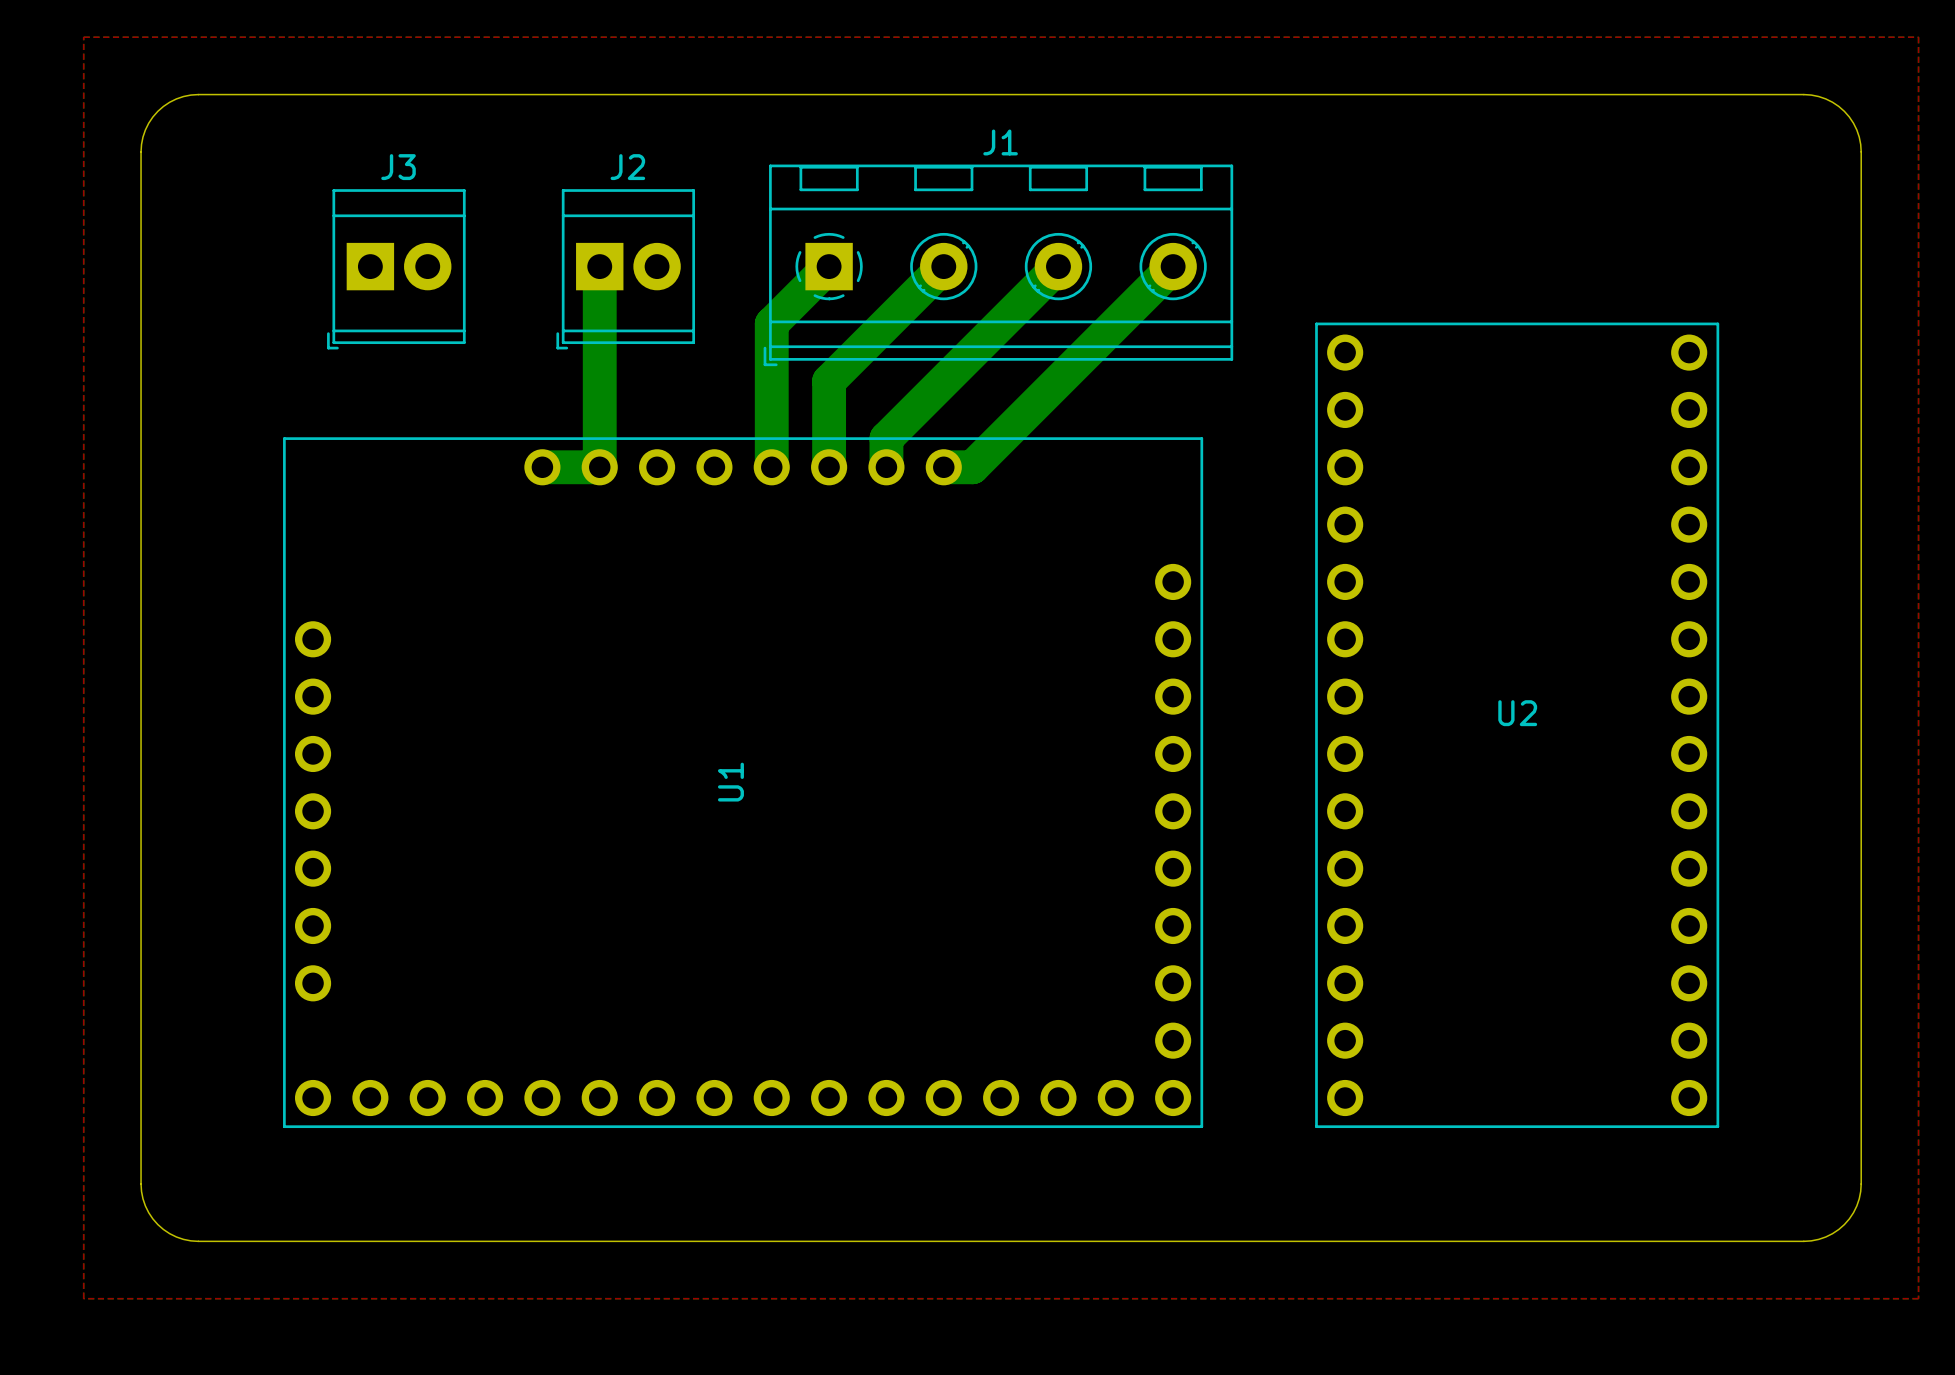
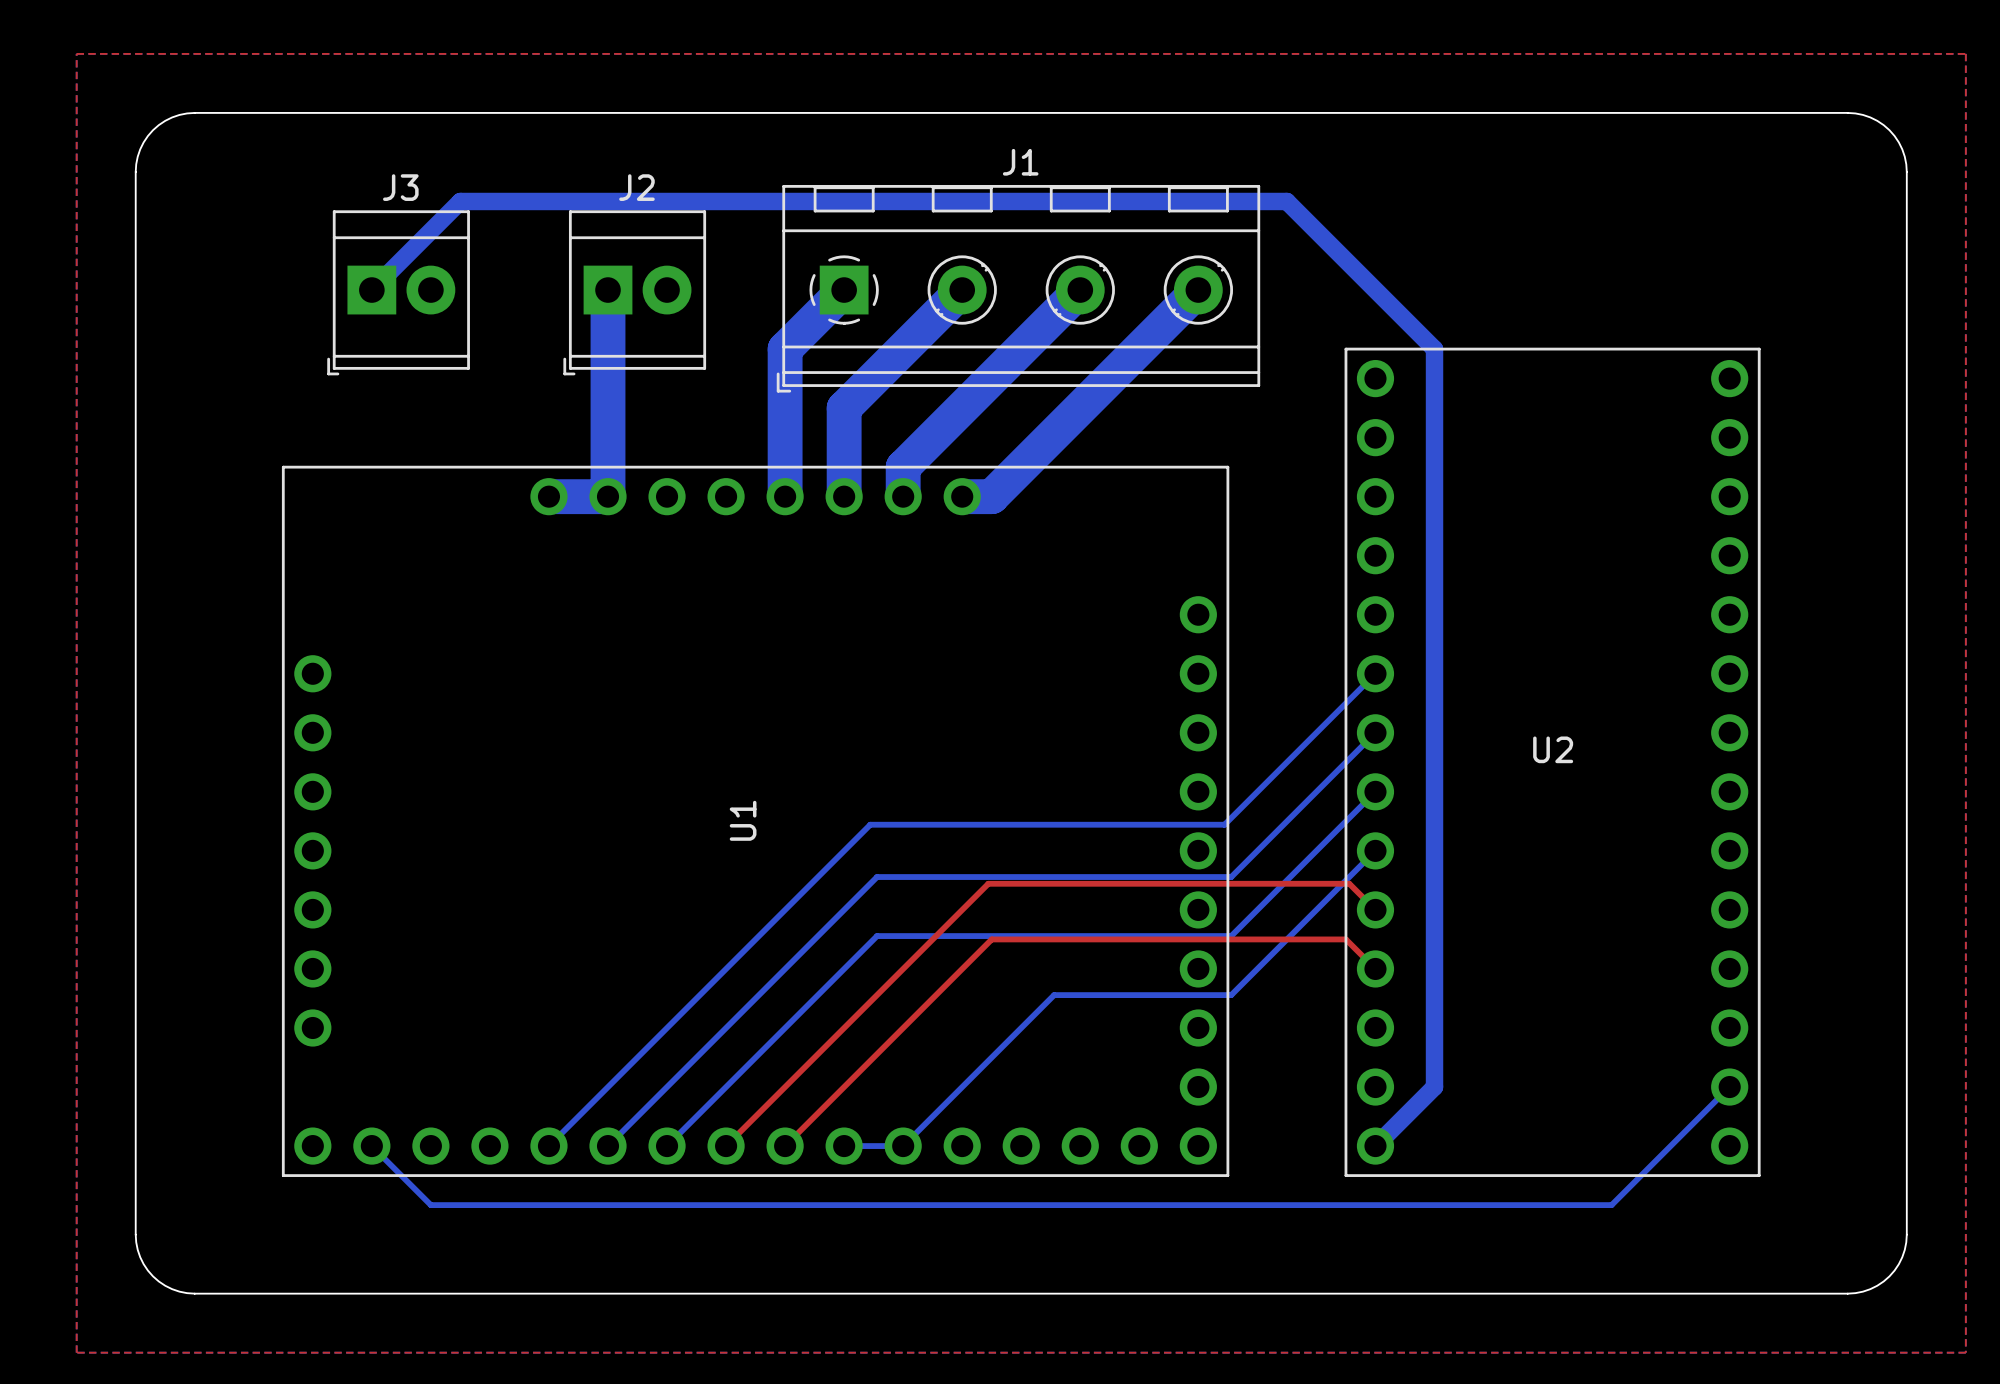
bottom track: none -> (371, 290) (460, 201) (1286, 201) (1434, 349) (1434, 1087) (1375, 1146)
bottom track: none -> (1375, 673) (1224, 824) (870, 824) (548, 1146)
bottom track: none -> (1375, 732) (1231, 877) (877, 877) (608, 1146)
bottom track: none -> (1375, 791) (1231, 936) (877, 936) (667, 1146)
bottom track: none -> (1375, 850) (1231, 995) (1054, 995) (903, 1146) (844, 1146)
top track: none -> (1375, 909) (1349, 883) (988, 883) (726, 1146)
top track: none -> (1375, 968) (1345, 939) (991, 939) (785, 1146)
bottom track: none -> (1729, 1087) (1611, 1205) (430, 1205) (371, 1146)

